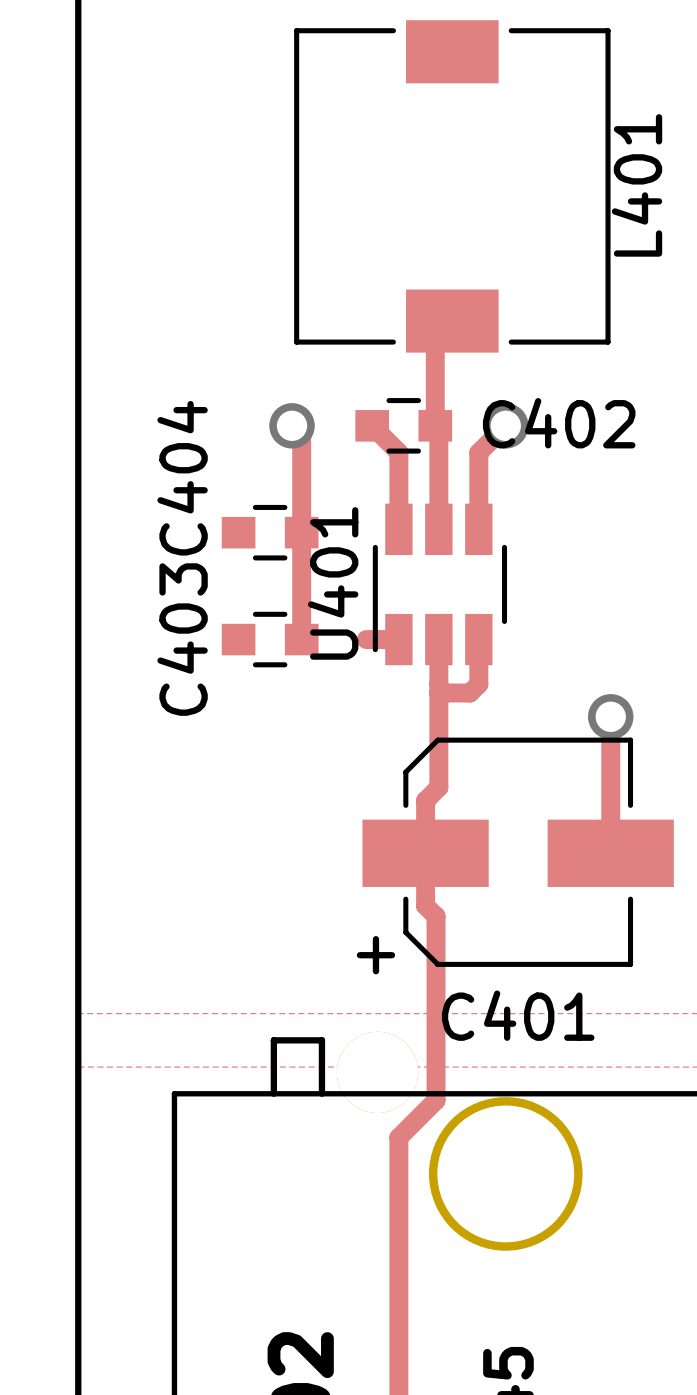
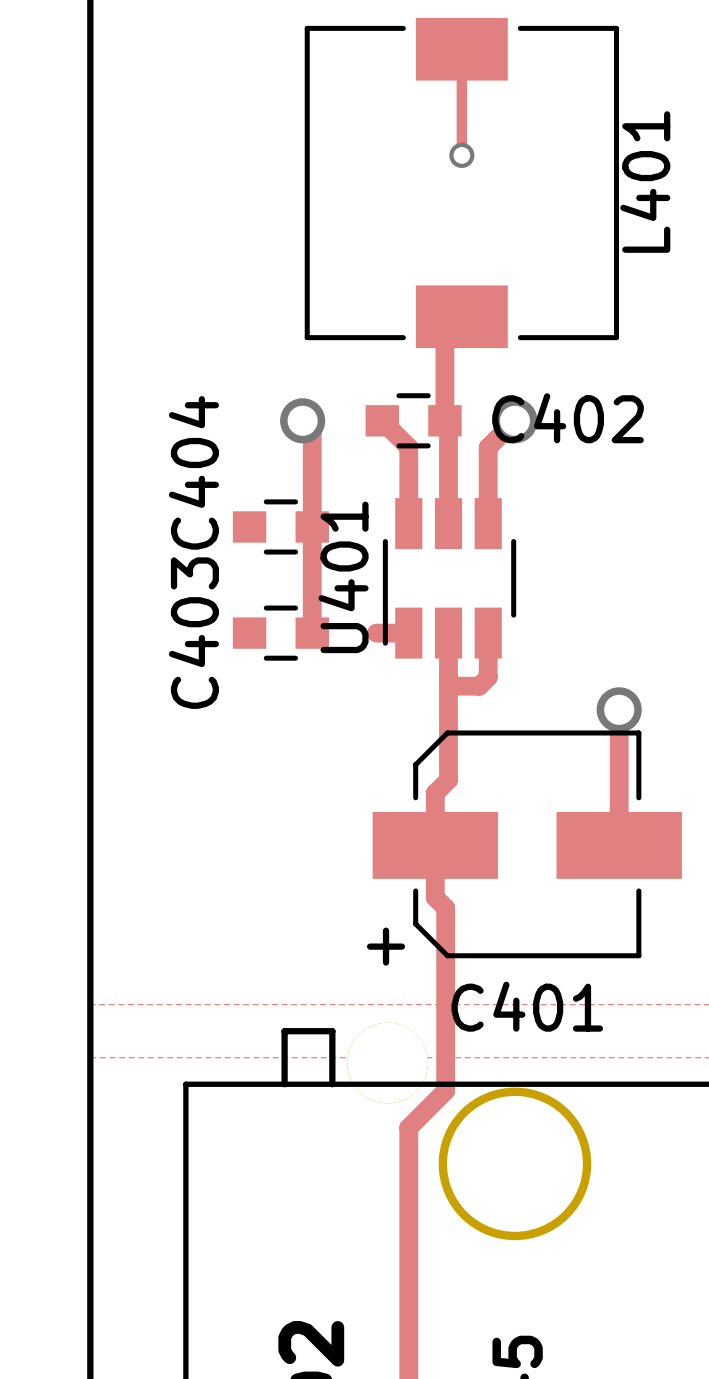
track: none -> (461, 49) (461, 155)
via: none -> (461, 155)

